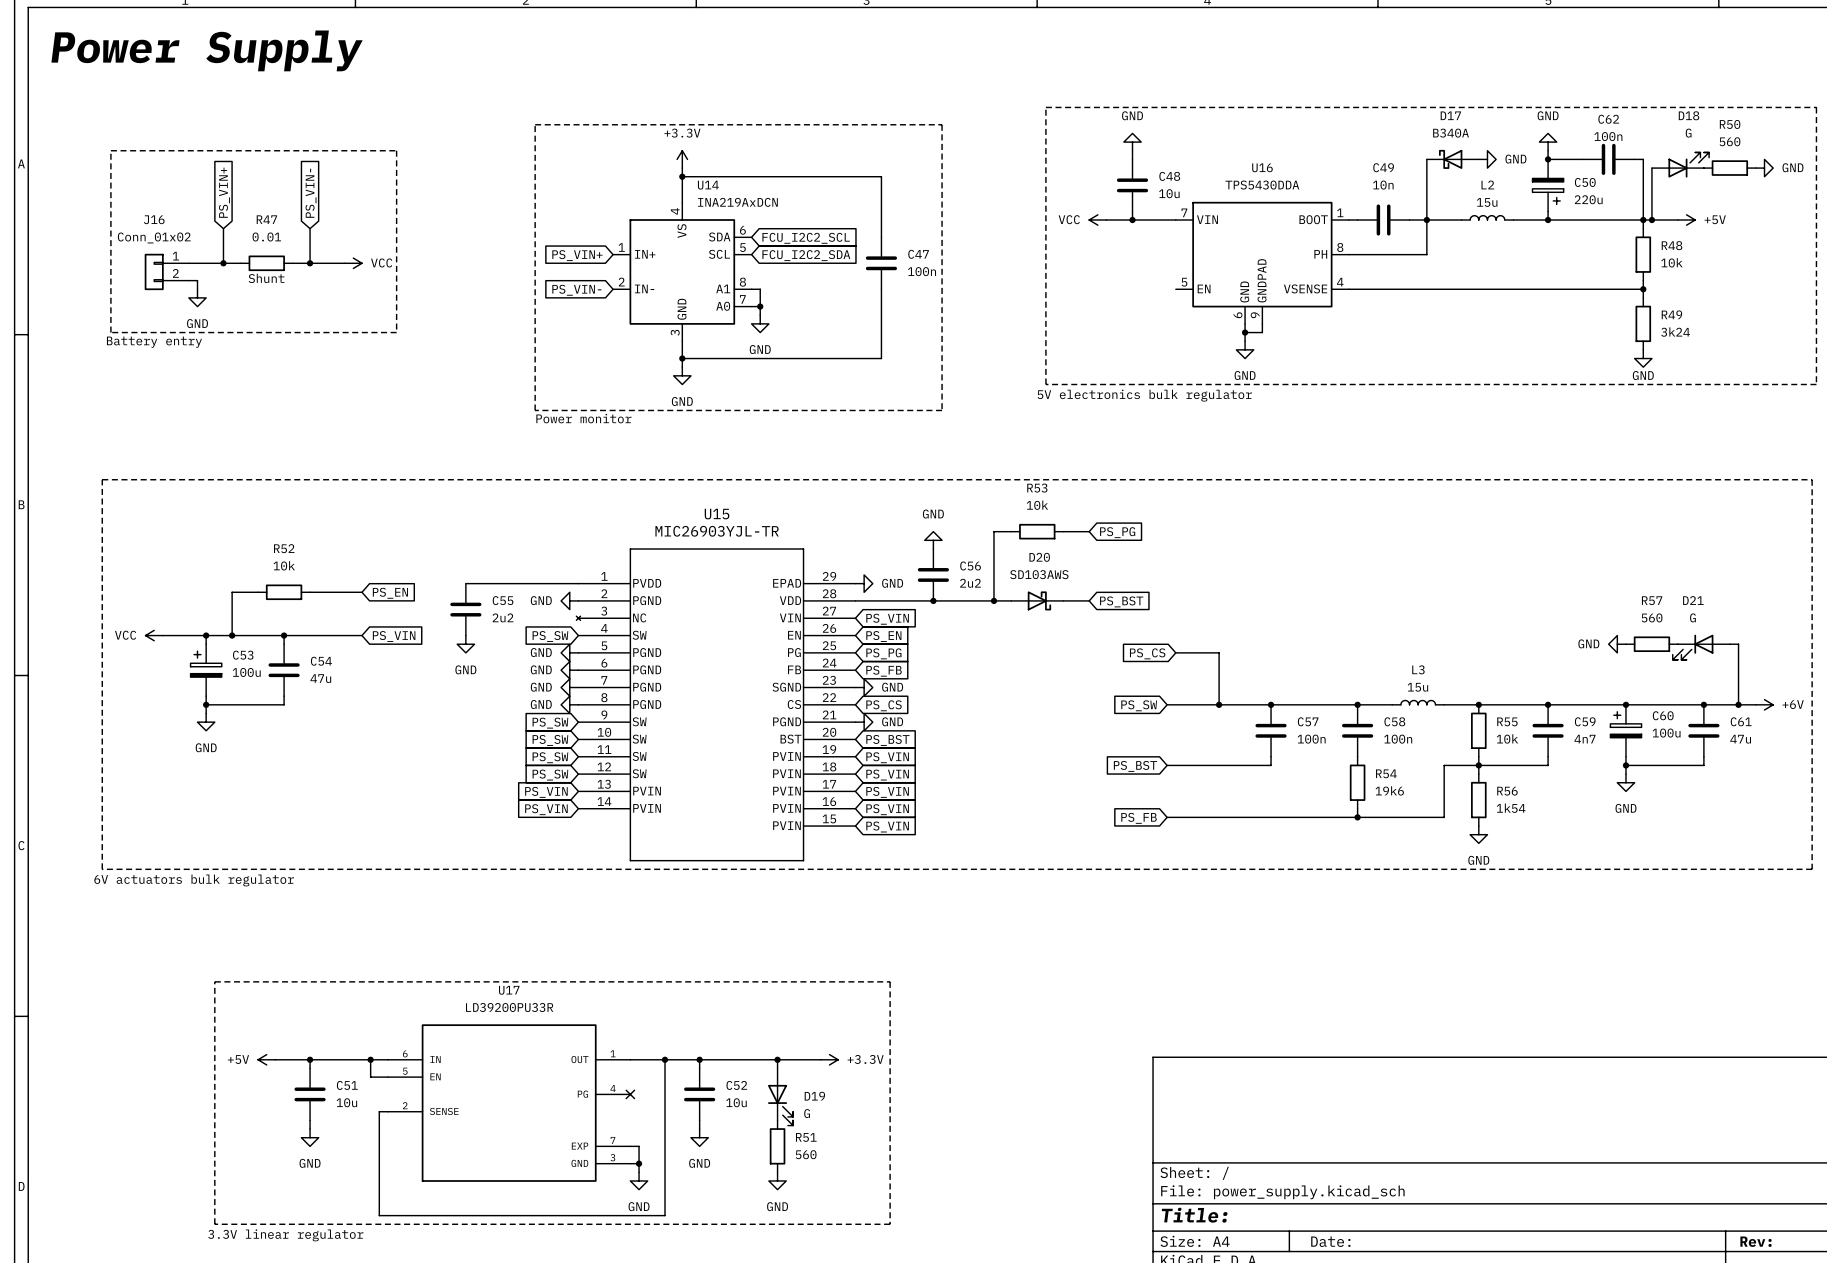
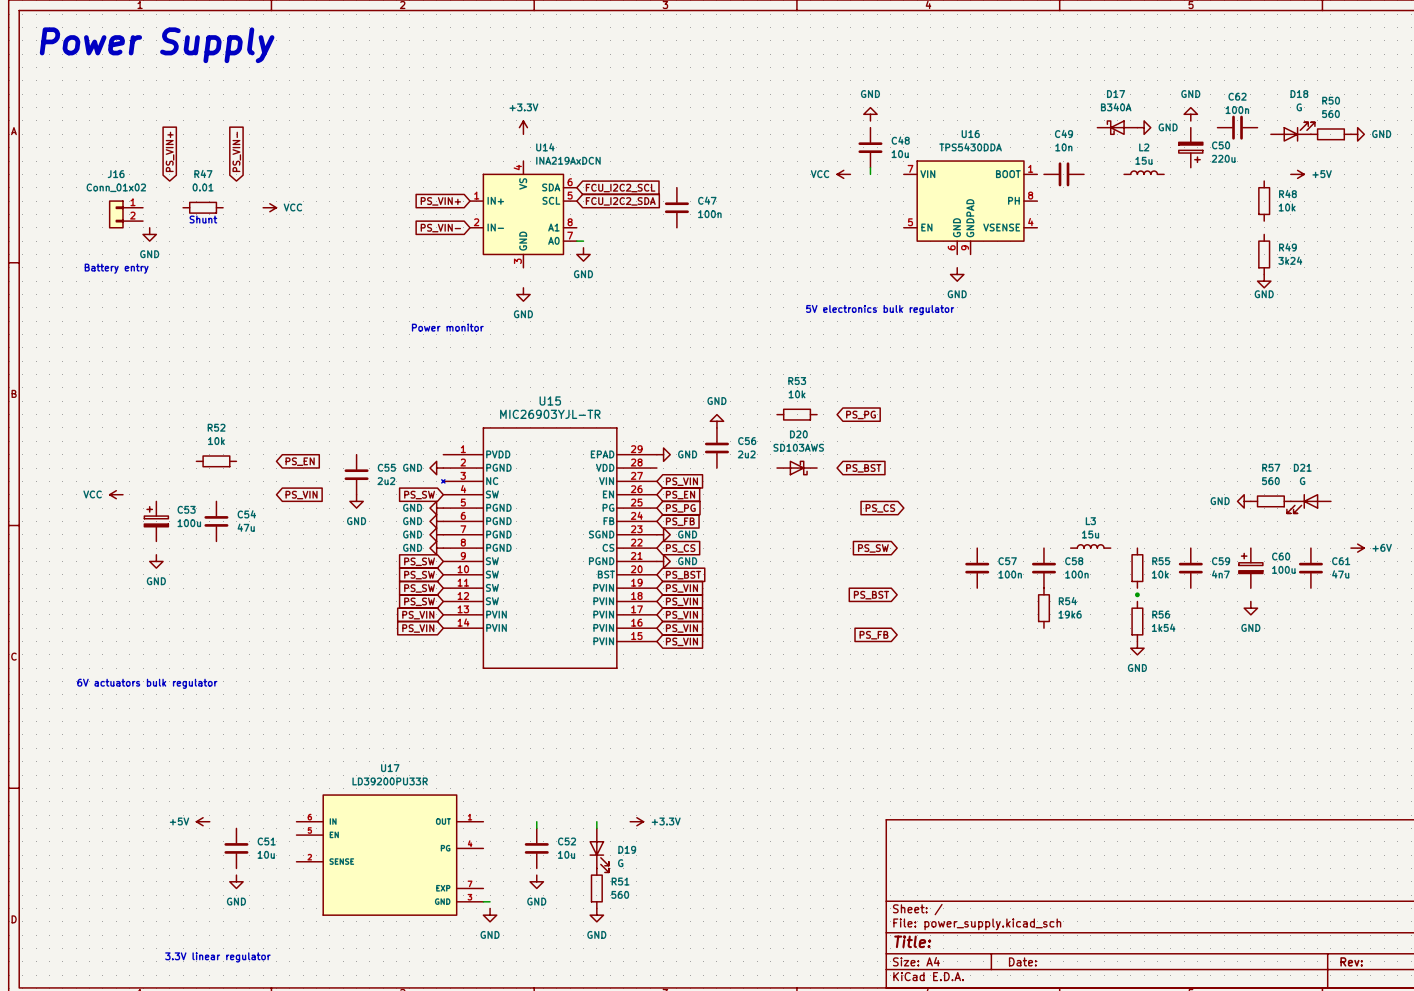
line: (1045, 107) (1816, 107) (1816, 384) (1045, 384) (1045, 107) -> none
line: (535, 124) (942, 124) (942, 410) (535, 410) (535, 124) -> none
line: (110, 150) (396, 150) (396, 332) (110, 332) (110, 150) -> none
wire: (1132, 150) (1132, 159) -> none
wire: (1548, 150) (1548, 159) (1582, 159) -> none
wire: (1426, 159) (1426, 254) (1348, 254) -> none
junction: (1548, 159) -> none
wire: (1634, 159) (1643, 159) (1643, 228) -> none
wire: (682, 168) (682, 202) -> none
wire: (1651, 168) (1651, 220) -> none
wire: (682, 176) (881, 176) (881, 237) -> none
junction: (682, 176) -> none
wire: (1548, 211) (1548, 220) -> none
wire: (1106, 220) (1175, 220) -> none
junction: (1132, 220) -> none
wire: (1348, 220) (1357, 220) -> none
wire: (1409, 220) (1461, 220) -> none
junction: (1426, 220) -> none
wire: (1513, 220) (1677, 220) -> none
junction: (1548, 220) -> none
junction: (1643, 220) -> none
junction: (1651, 220) -> none
wire: (223, 228) (223, 263) -> none
wire: (310, 228) (310, 263) -> none
wire: (188, 263) (240, 263) -> none
junction: (223, 263) -> none
wire: (292, 263) (344, 263) -> none
junction: (310, 263) -> none
wire: (188, 280) (197, 280) (197, 289) -> none
wire: (1643, 280) (1643, 297) -> none
wire: (751, 289) (760, 289) (760, 315) -> none
wire: (881, 289) (881, 358) (682, 358) -> none
wire: (1348, 289) (1643, 289) -> none
junction: (1643, 289) -> none
junction: (760, 306) -> none
wire: (1245, 323) (1245, 341) -> none
wire: (1262, 323) (1262, 332) (1245, 332) -> none
junction: (1245, 332) -> none
wire: (682, 341) (682, 367) -> none
junction: (682, 358) -> none
line: (102, 479) (1812, 479) (1812, 869) (102, 869) (102, 479) -> none
wire: (1011, 531) (993, 531) (993, 600) -> none
wire: (1063, 531) (1089, 531) -> none
wire: (465, 583) (578, 583) -> none
wire: (258, 592) (232, 592) (232, 635) -> none
wire: (310, 592) (361, 592) -> none
wire: (855, 600) (1011, 600) -> none
junction: (933, 600) -> none
junction: (993, 600) -> none
wire: (1063, 600) (1089, 600) -> none
wire: (162, 635) (361, 635) -> none
wire: (206, 635) (206, 644) -> none
junction: (206, 635) -> none
junction: (232, 635) -> none
wire: (284, 635) (284, 644) -> none
junction: (284, 635) -> none
wire: (1729, 644) (1738, 644) (1738, 704) -> none
wire: (1175, 652) (1219, 652) (1219, 704) -> none
wire: (206, 696) (206, 713) -> none
wire: (284, 696) (284, 704) (206, 704) -> none
junction: (206, 704) -> none
wire: (1167, 704) (1392, 704) -> none
junction: (1219, 704) -> none
junction: (1271, 704) -> none
junction: (1357, 704) -> none
wire: (1444, 704) (1755, 704) -> none
junction: (1478, 704) -> none
junction: (1548, 704) -> none
junction: (1625, 704) -> none
junction: (1703, 704) -> none
junction: (1738, 704) -> none
wire: (1271, 756) (1271, 765) (1167, 765) -> none
wire: (1478, 756) (1478, 774) -> none
wire: (1548, 756) (1548, 765) (1444, 765) (1444, 817) (1167, 817) -> none
wire: (1625, 756) (1625, 774) -> none
wire: (1703, 756) (1703, 765) (1625, 765) -> none
junction: (1625, 765) -> none
wire: (1357, 808) (1357, 817) -> none
junction: (1357, 817) -> none
line: (214, 981) (890, 981) (890, 1224) (214, 1224) (214, 981) -> none
wire: (275, 1059) (387, 1059) -> none
wire: (310, 1059) (310, 1068) -> none
junction: (310, 1059) -> none
wire: (370, 1059) (370, 1077) (387, 1077) -> none
junction: (370, 1059) -> none
wire: (630, 1059) (820, 1059) -> none
wire: (665, 1059) (665, 1215) (379, 1215) (379, 1111) (387, 1111) -> none
junction: (665, 1059) -> none
junction: (699, 1059) -> none
junction: (777, 1059) -> none
no-connect mark: (630, 1094) -> none
wire: (310, 1120) (310, 1129) -> none
wire: (699, 1120) (699, 1129) -> none
wire: (630, 1146) (639, 1146) (639, 1172) -> none
junction: (639, 1163) -> none

